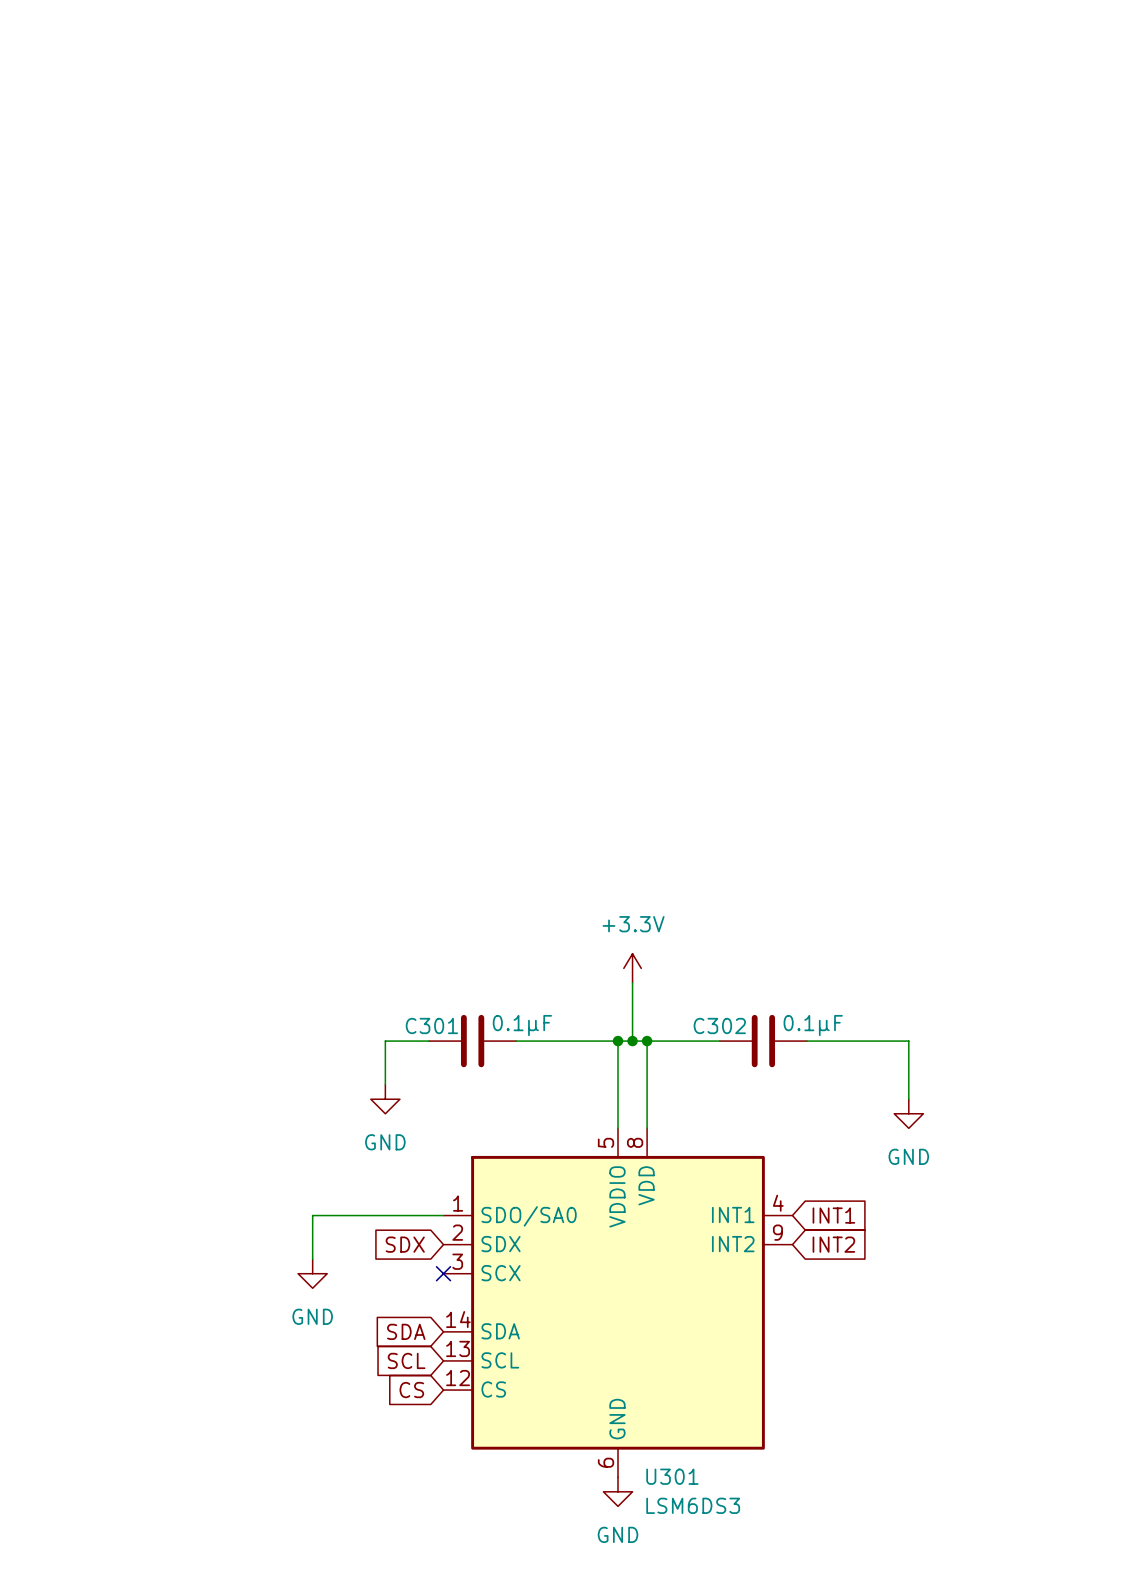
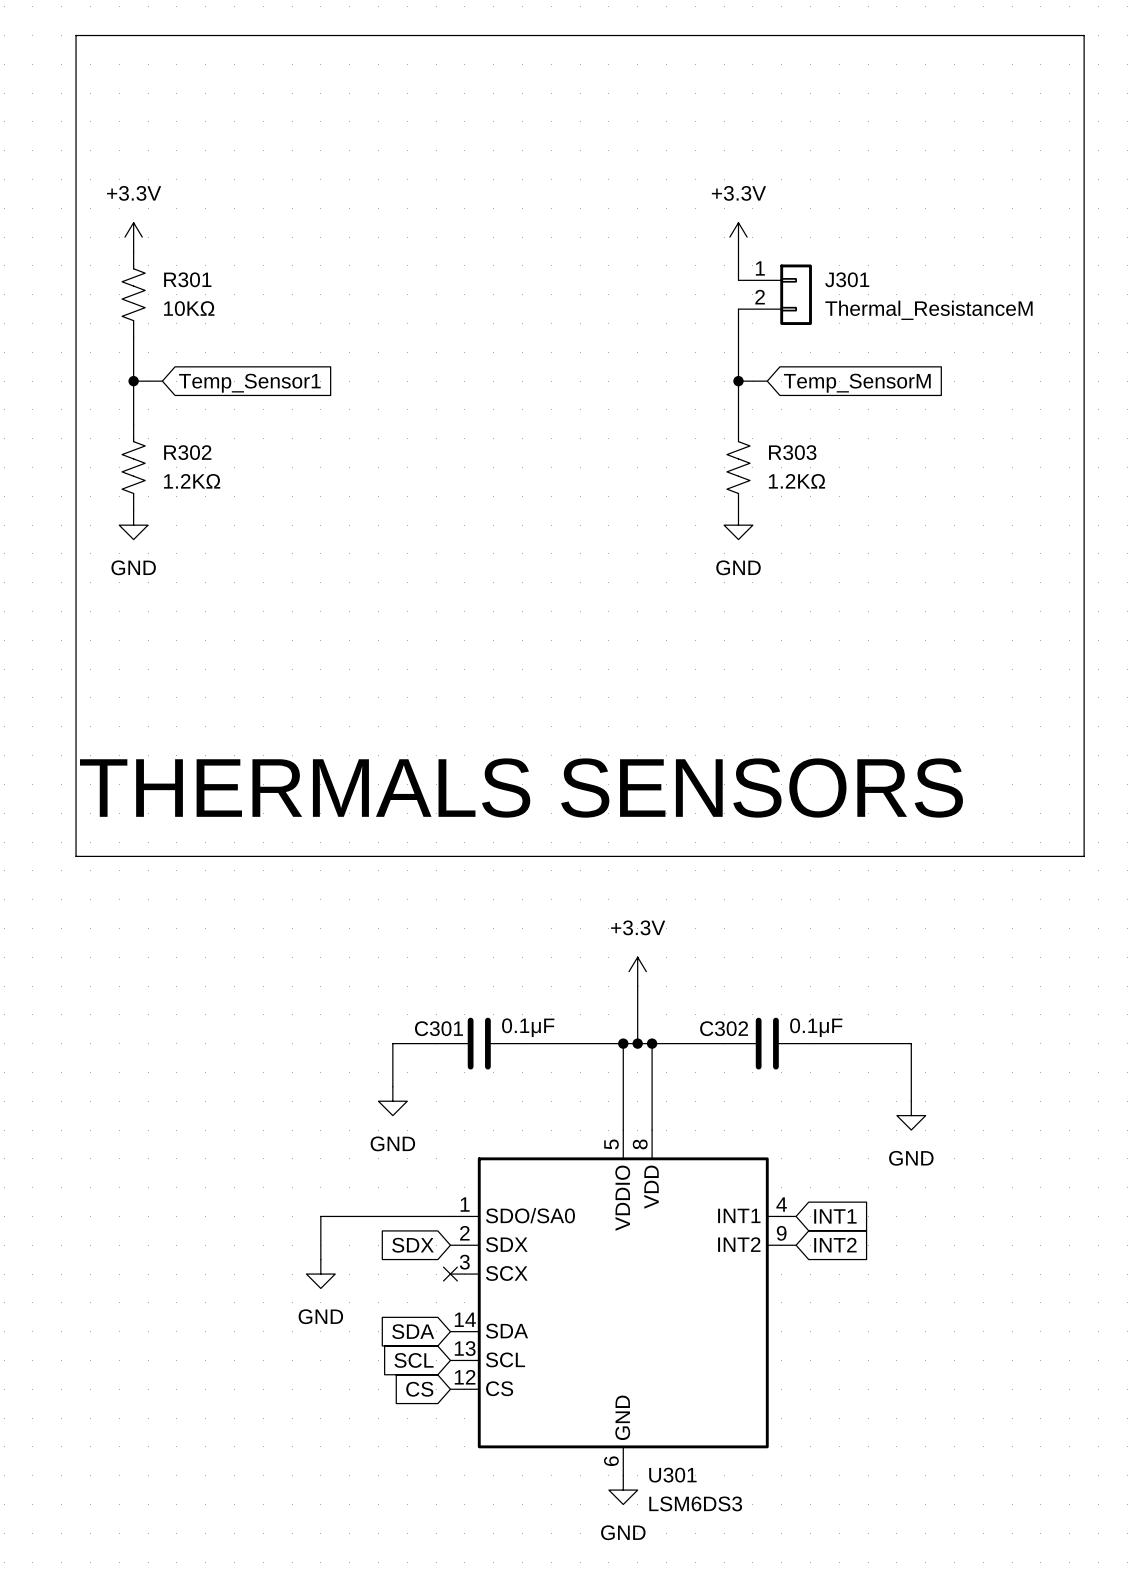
line: none -> (76, 35) (1084, 35) (1084, 856) (76, 856) (76, 35)
power symbol: none -> +3.3V (133, 237)
power symbol: none -> +3.3V (738, 237)
wire: none -> (738, 251) (738, 280)
R301: none -> 10KΩ (133, 294)
J301: none -> Thermal_ResistanceM (775, 294)
wire: none -> (738, 309) (738, 424)
wire: none -> (133, 337) (133, 424)
wire: none -> (133, 381) (162, 381)
junction: none -> (133, 381)
wire: none -> (738, 381) (767, 381)
junction: none -> (738, 381)
global label: none -> Temp_Sensor1 (249, 383)
global label: none -> Temp_SensorM (857, 383)
R302: none -> 1.2KΩ (133, 467)
R303: none -> 1.2KΩ (738, 467)
power symbol: none -> GND (133, 525)
power symbol: none -> GND (738, 525)
text: none -> THERMALS SENSORS (521, 788)

